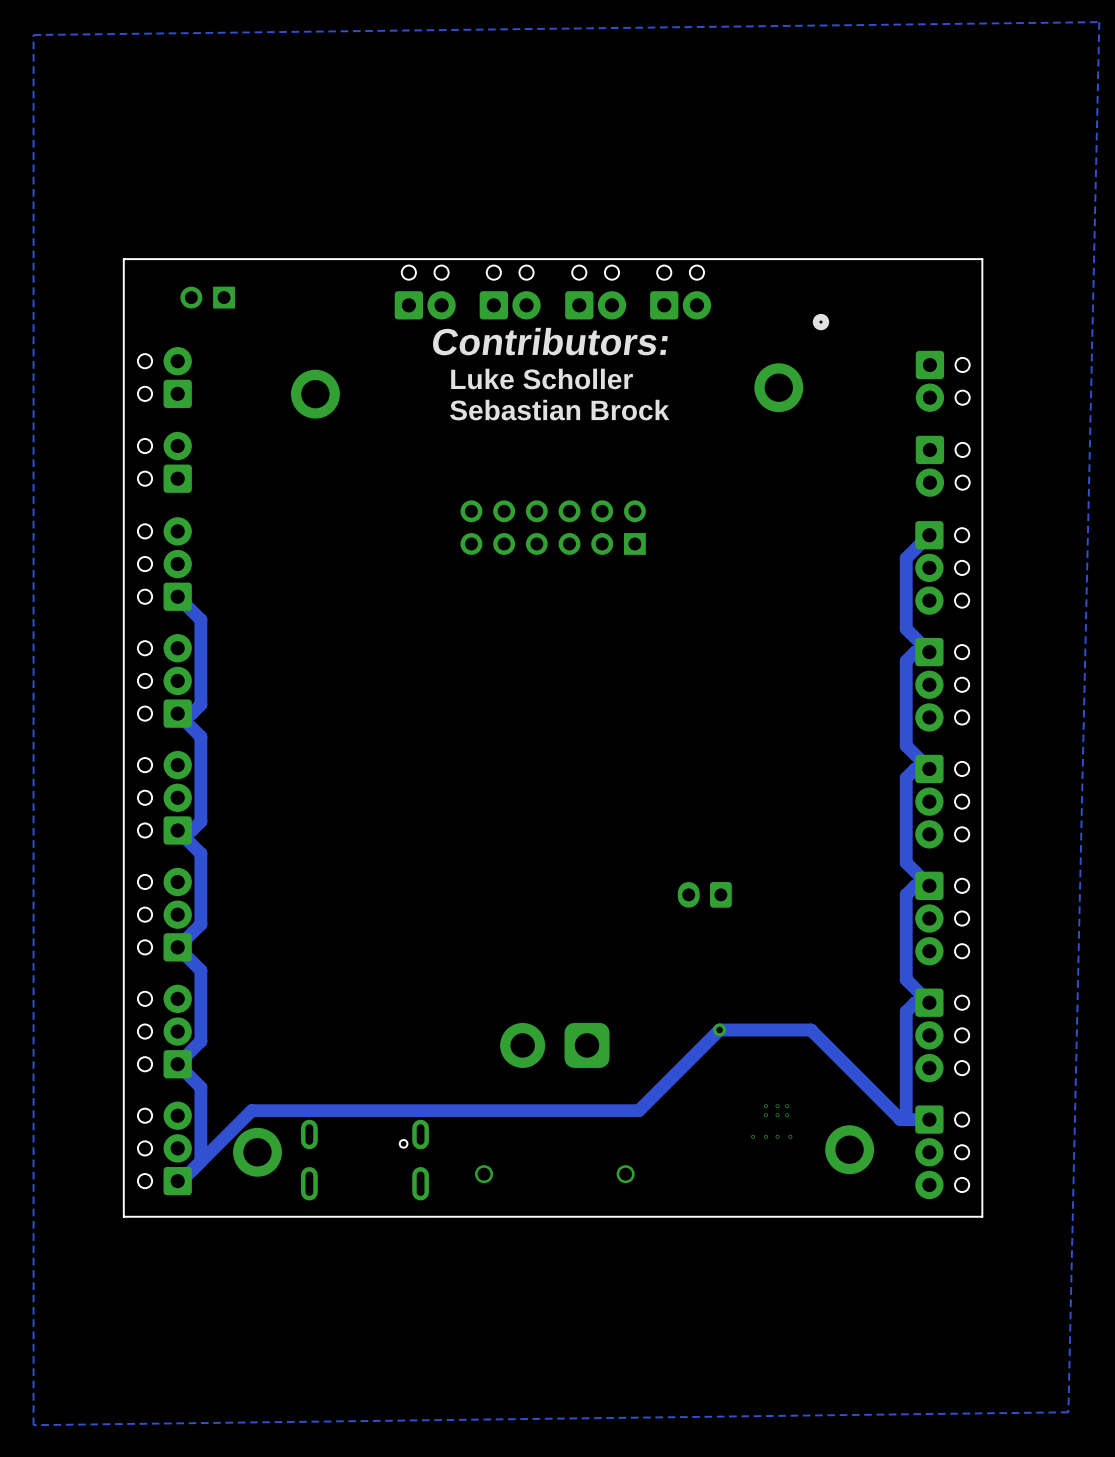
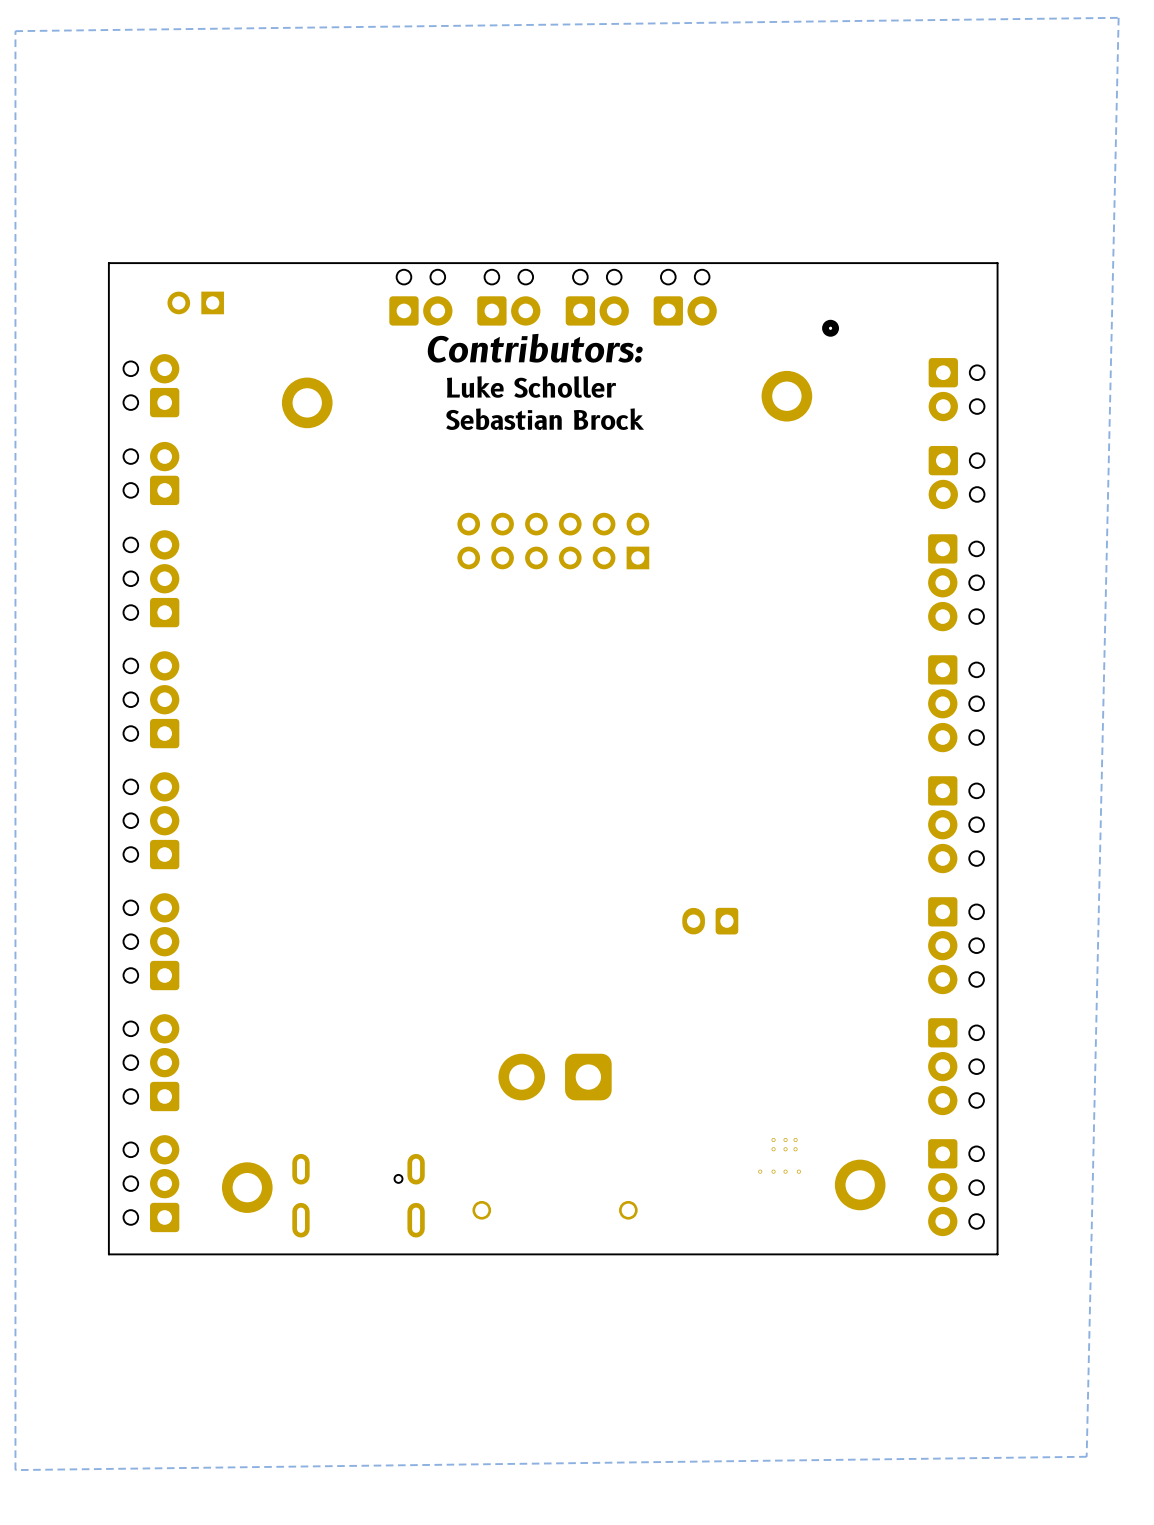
track: (929, 535) (906, 558) (906, 628) (929, 652) (915, 652) (906, 661) (906, 745) (929, 768) (915, 768) (906, 777) (906, 862) (929, 885) (915, 885) (906, 894) (906, 979) (929, 1002) (915, 1002) (906, 1011) (906, 1117) (908, 1119) -> none
track: (177, 596) (200, 619) (200, 704) (191, 713) (177, 713) (200, 736) (200, 821) (191, 830) (177, 830) (200, 853) (200, 924) (177, 947) -> none
track: (177, 947) (200, 970) (200, 1041) (177, 1064) -> none
via: (719, 1030) -> none
track: (177, 1064) (200, 1087) (200, 1161) -> none
track: (929, 1119) (900, 1119) (810, 1030) (719, 1030) (638, 1110) (251, 1110) (181, 1181) (177, 1181) -> none

